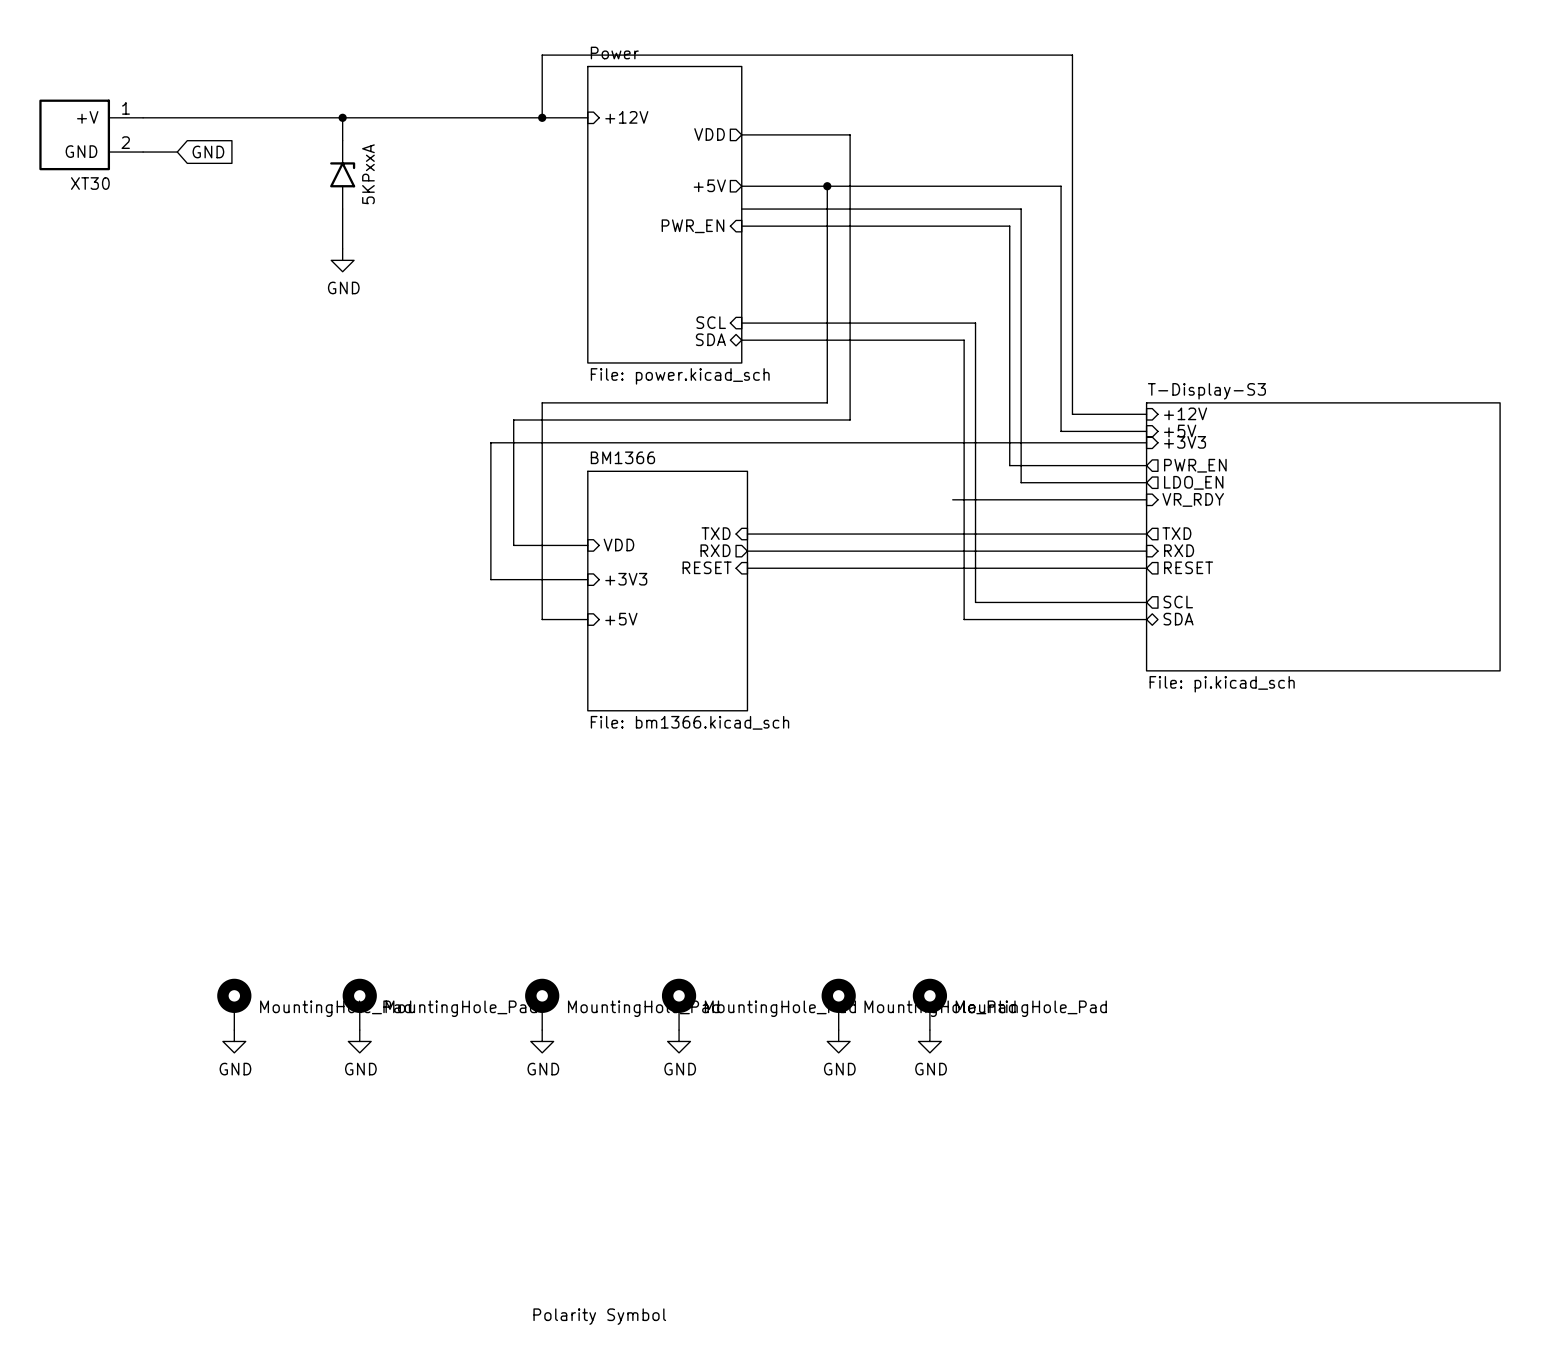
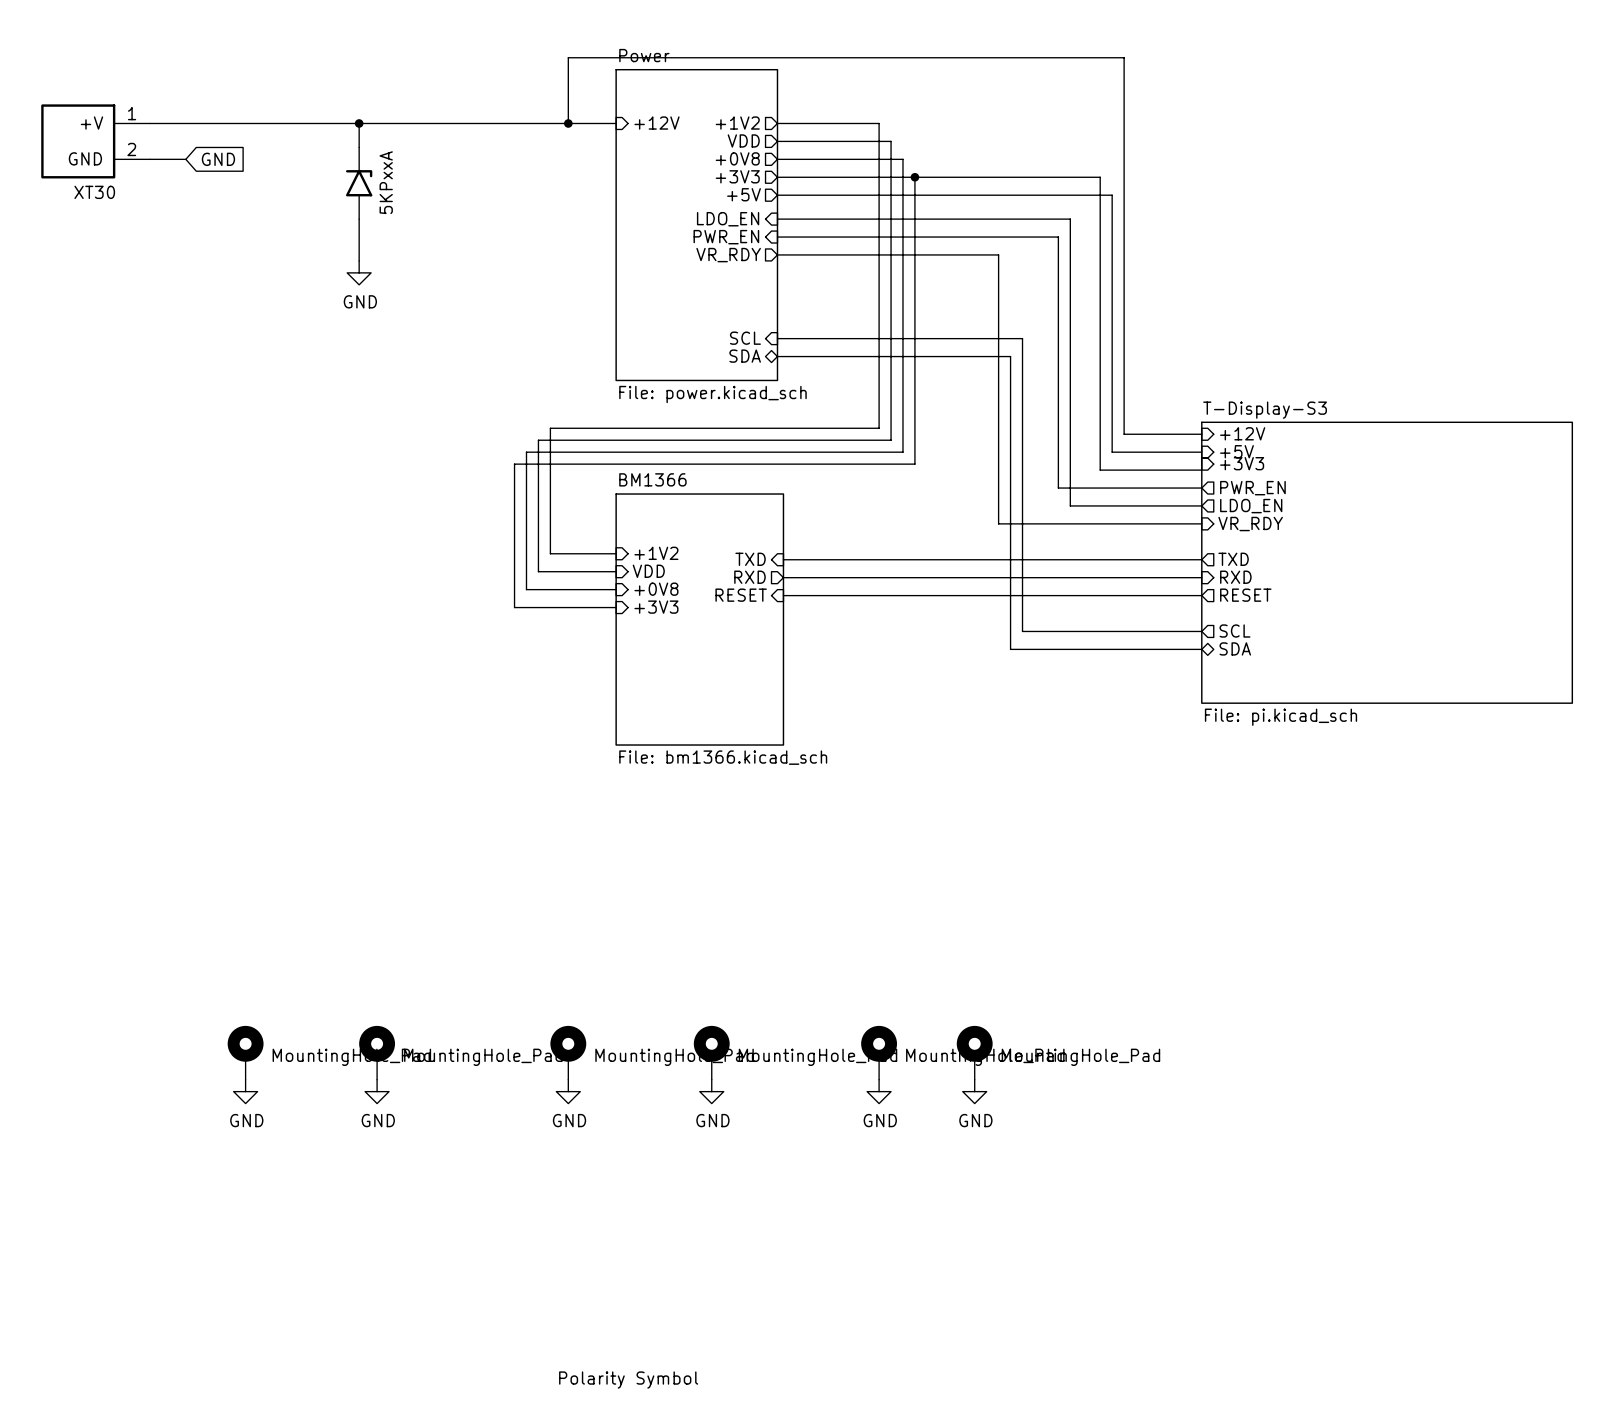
sheet pin: none -> +1V2 (737, 123)
wire: none -> (777, 123) (879, 123) (879, 428) (550, 428) (550, 553) (616, 553)
sheet pin: none -> +0V8 (737, 158)
wire: none -> (777, 159) (902, 159) (902, 452) (526, 452) (526, 589) (616, 589)
sheet pin: none -> +3V3 (737, 176)
wire: none -> (777, 177) (1100, 177) (1100, 470) (1201, 470)
wire: (827, 186) (827, 402) (542, 402) (542, 619) (587, 619) -> none
junction position: (827, 186) -> (914, 177)
sheet pin: none -> LDO_EN (728, 219)
sheet pin: none -> VR_RDY (728, 255)
wire: none -> (777, 254) (998, 254) (998, 523)
wire: (872, 442) (1146, 442) -> (914, 464) (914, 177)
sheet pin: none -> +1V2 (656, 553)
sheet pin: none -> +0V8 (656, 589)
sheet pin: +5V (621, 619) -> none

